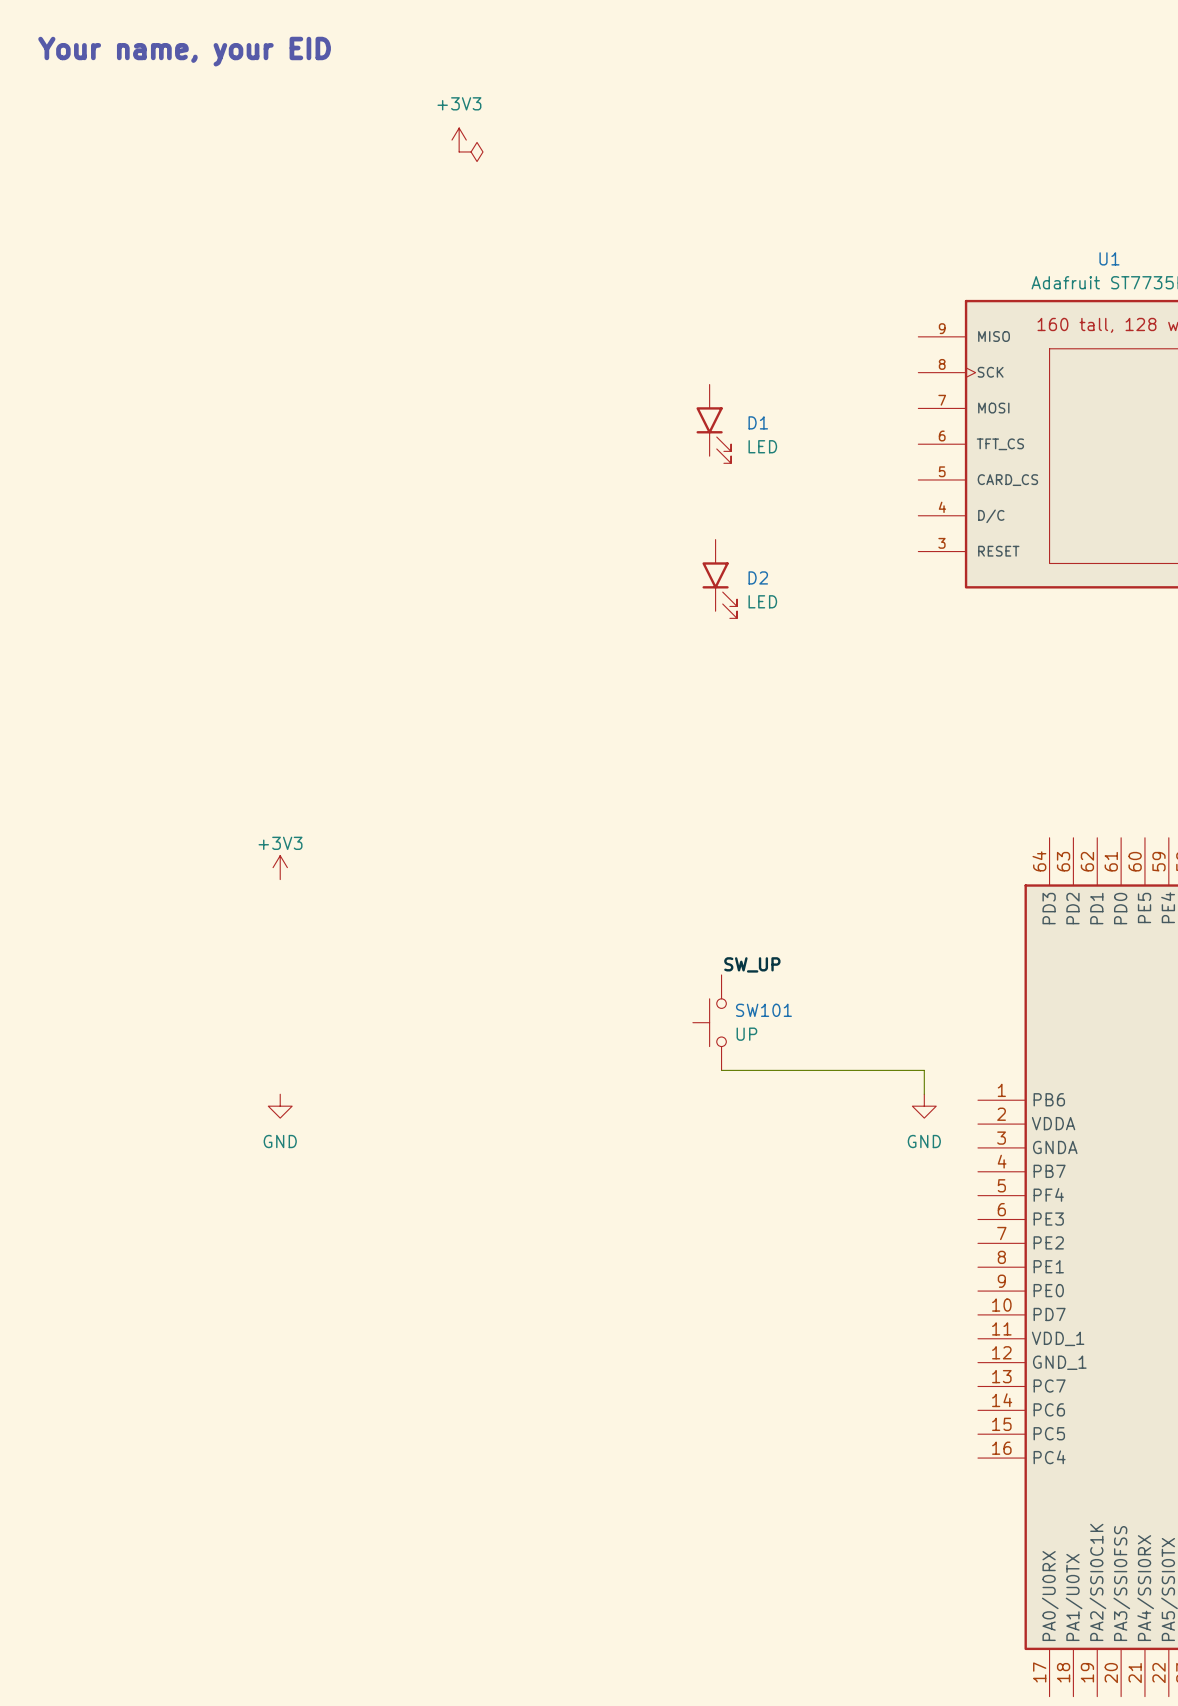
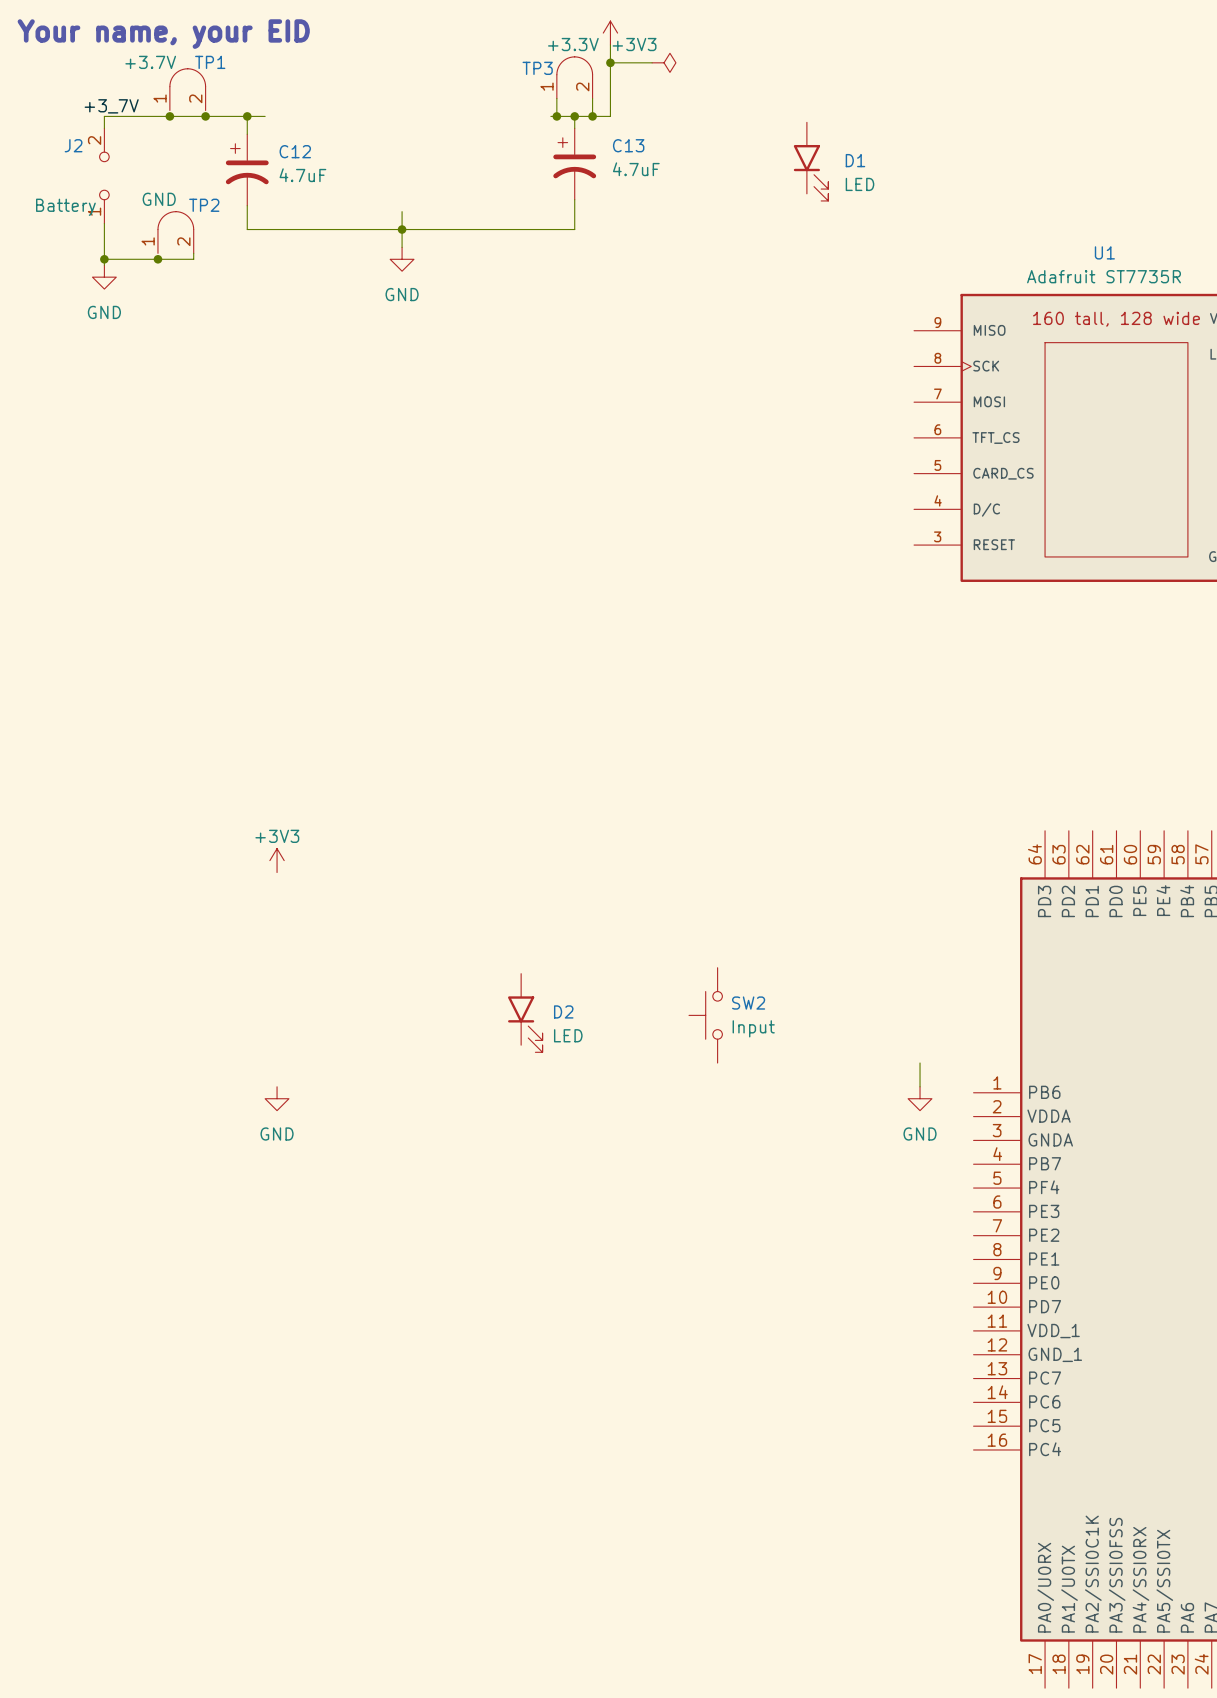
wire: none -> (610, 44) (610, 116) (550, 116)
text position: Your name, your EID (184, 51) -> Your name, your EID (163, 34)
wire: none -> (610, 62) (652, 62)
junction: none -> (610, 62)
TP3: none -> +3.3V (574, 77)
TP1: none -> +3.7V (187, 89)
power symbol text position: +3V3 (459, 103) -> +3V3 (634, 44)
wire: none -> (556, 98) (556, 116)
wire: none -> (592, 98) (592, 116)
label: none -> +3_7V (111, 106)
junction: none -> (169, 116)
junction: none -> (205, 116)
wire: none -> (247, 116) (247, 134)
junction: none -> (247, 116)
wire: none -> (265, 116) (104, 116) (104, 128)
junction: none -> (556, 116)
wire: none -> (574, 116) (574, 128)
junction: none -> (574, 116)
junction: none -> (592, 116)
power symbol position: +3V3 (459, 140) -> +3V3 (610, 33)
power symbol position: (471, 151) -> (664, 62)
C13: none -> 4.7uF (574, 164)
C12: none -> 4.7uF (247, 169)
J2: none -> Battery (104, 175)
wire: none -> (574, 199) (574, 229) (247, 229) (247, 205)
wire: none -> (402, 211) (402, 247)
wire: none -> (104, 223) (104, 265)
junction: none -> (402, 229)
TP2: none -> GND (175, 232)
wire: none -> (193, 253) (193, 259) (104, 259)
junction: none -> (104, 259)
junction: none -> (157, 259)
power symbol: none -> GND (402, 259)
power symbol: none -> GND (104, 277)
D1 position: (713, 423) -> (811, 161)
D2 position: (719, 578) -> (525, 1013)
label: SW_UP (752, 964) -> none
SW101 name: SW101 (763, 1010) -> SW2 (748, 1003)
SW101 value: UP (746, 1034) -> Input (753, 1028)
wire: (721, 1070) (924, 1070) -> none

